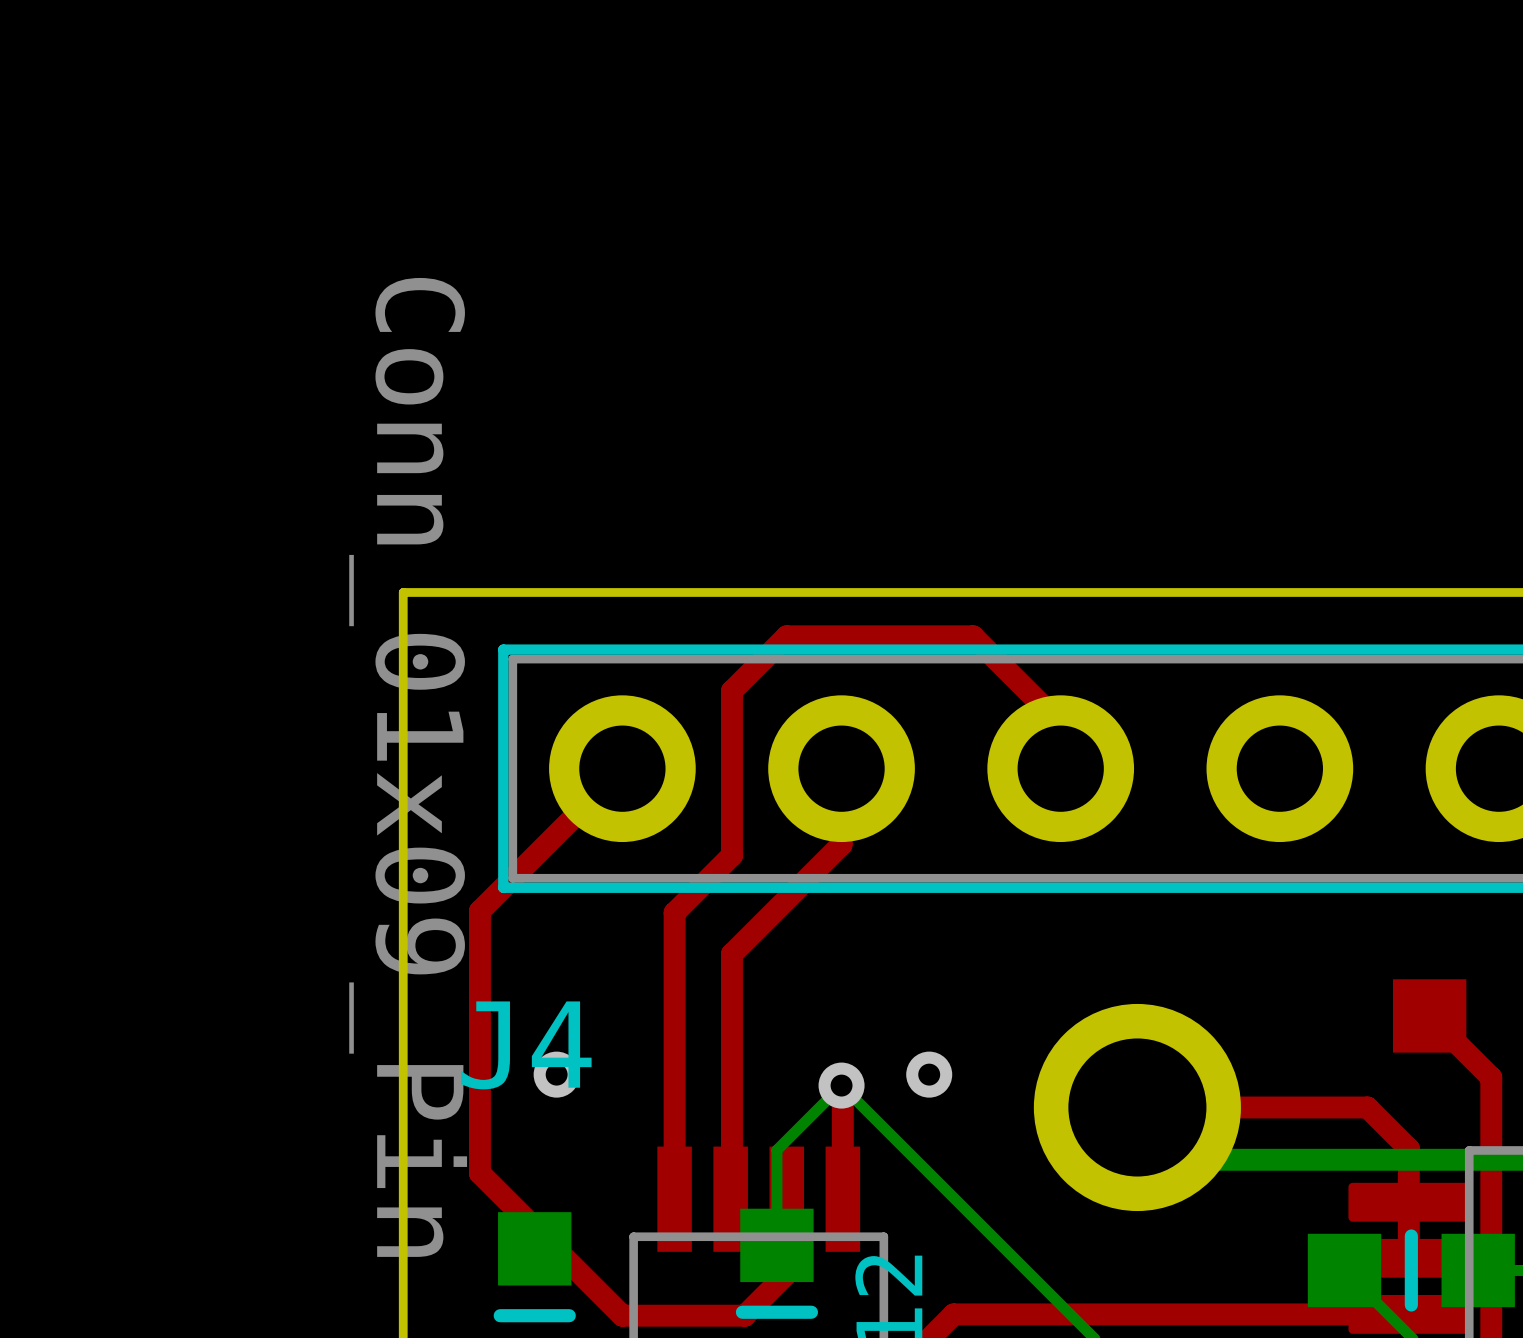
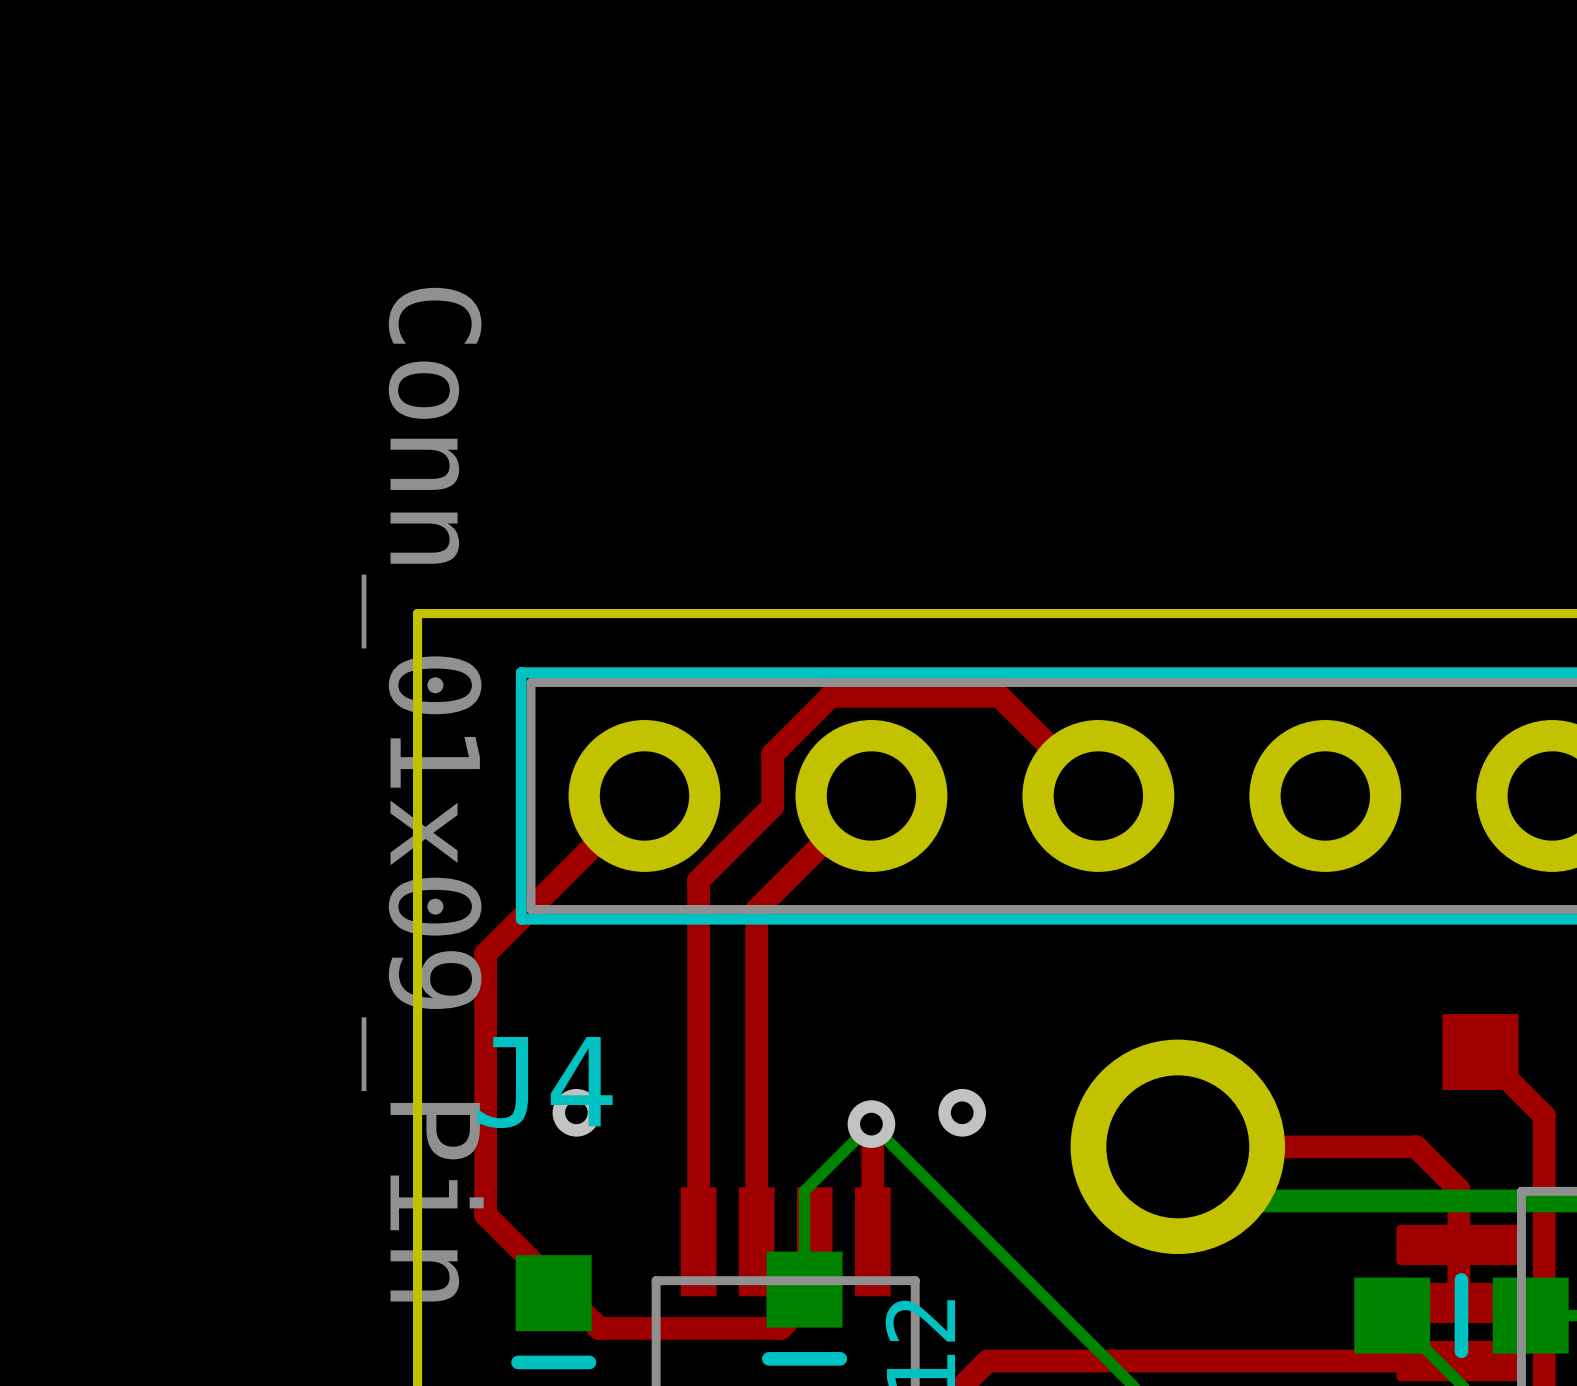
top track: (622, 768) (479, 911) (479, 1173) (622, 1315) (744, 1315) (786, 1273) (786, 1249) -> (644, 795) (485, 953) (485, 1214) (599, 1328) (780, 1328) (814, 1294)
top track: (841, 768) (841, 844) (731, 954) (730, 1199) -> (871, 795) (756, 909) (756, 1241)
top track: (1060, 768) (1060, 723) (973, 636) (786, 636) (731, 691) (731, 855) (674, 912) -> (1098, 795) (999, 696) (830, 696) (772, 754) (772, 806) (698, 880) (698, 945)

